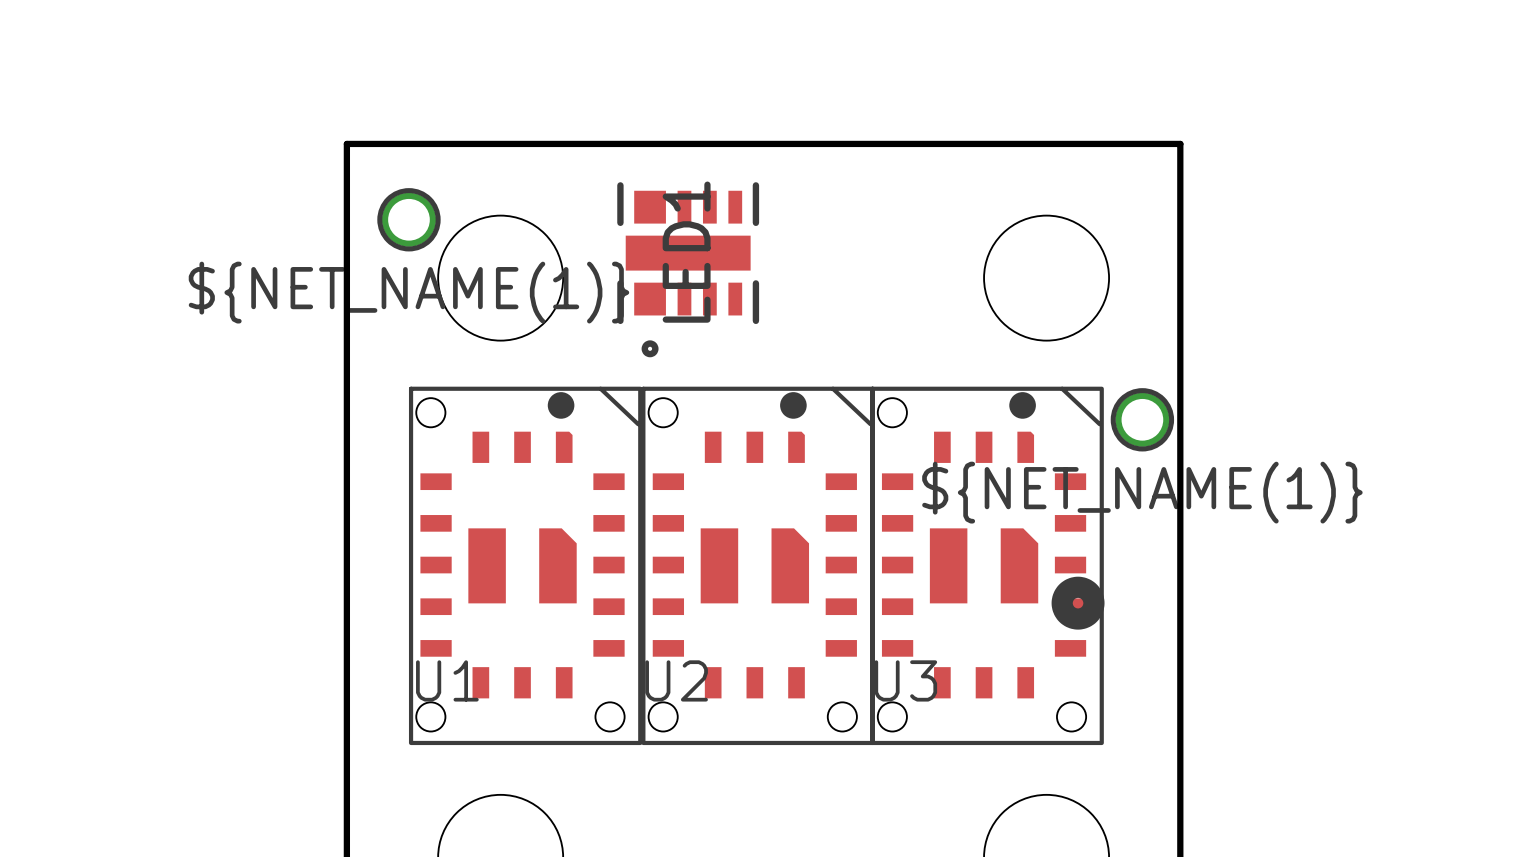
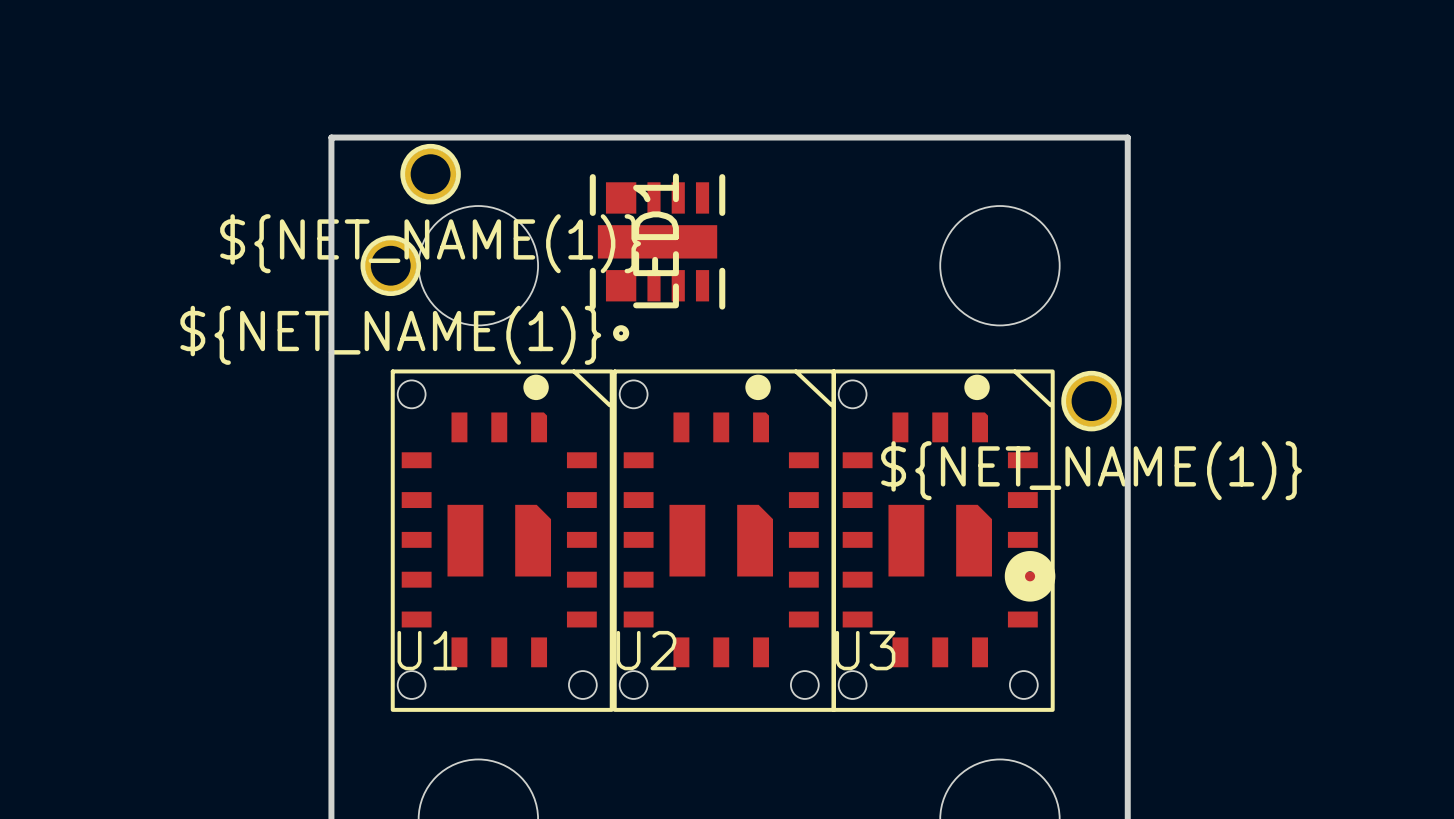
part: none -> (430, 174)
part: (408, 219) -> none
part: none -> (390, 265)

